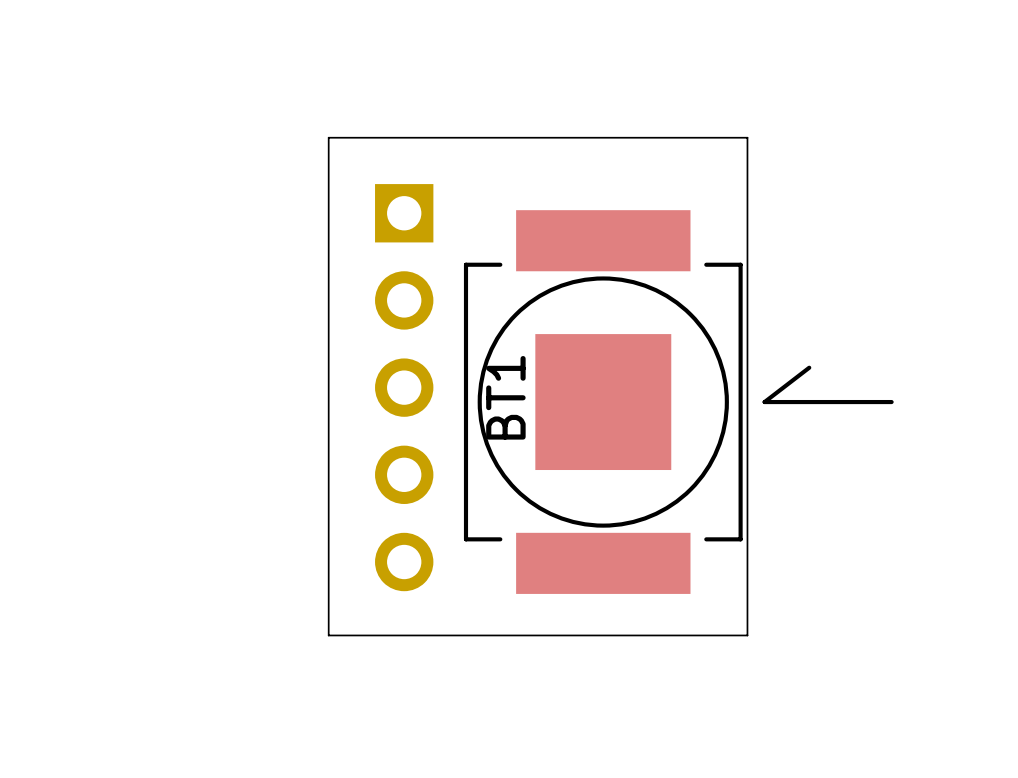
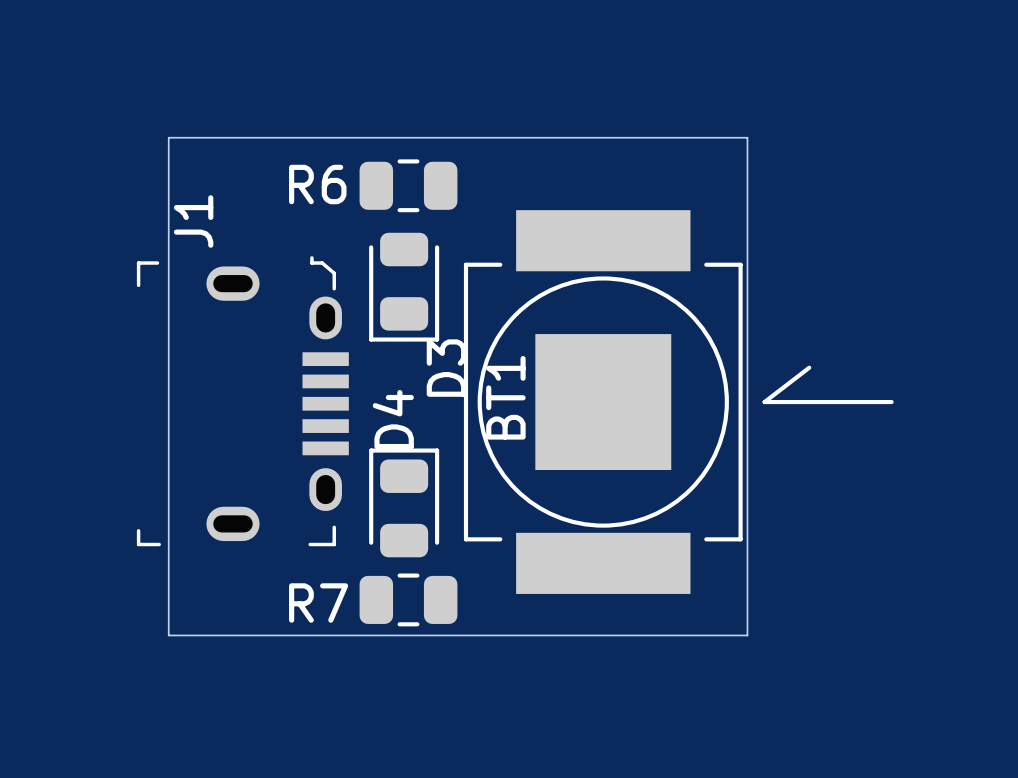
board edge: (328, 137) (328, 635) -> (328, 137) (168, 137) (168, 635) (328, 635)
R6: none -> (408, 185)
D3: none -> (404, 287)
part: (404, 387) -> none
J1: none -> (242, 401)
D4: none -> (404, 502)
R7: none -> (408, 599)

